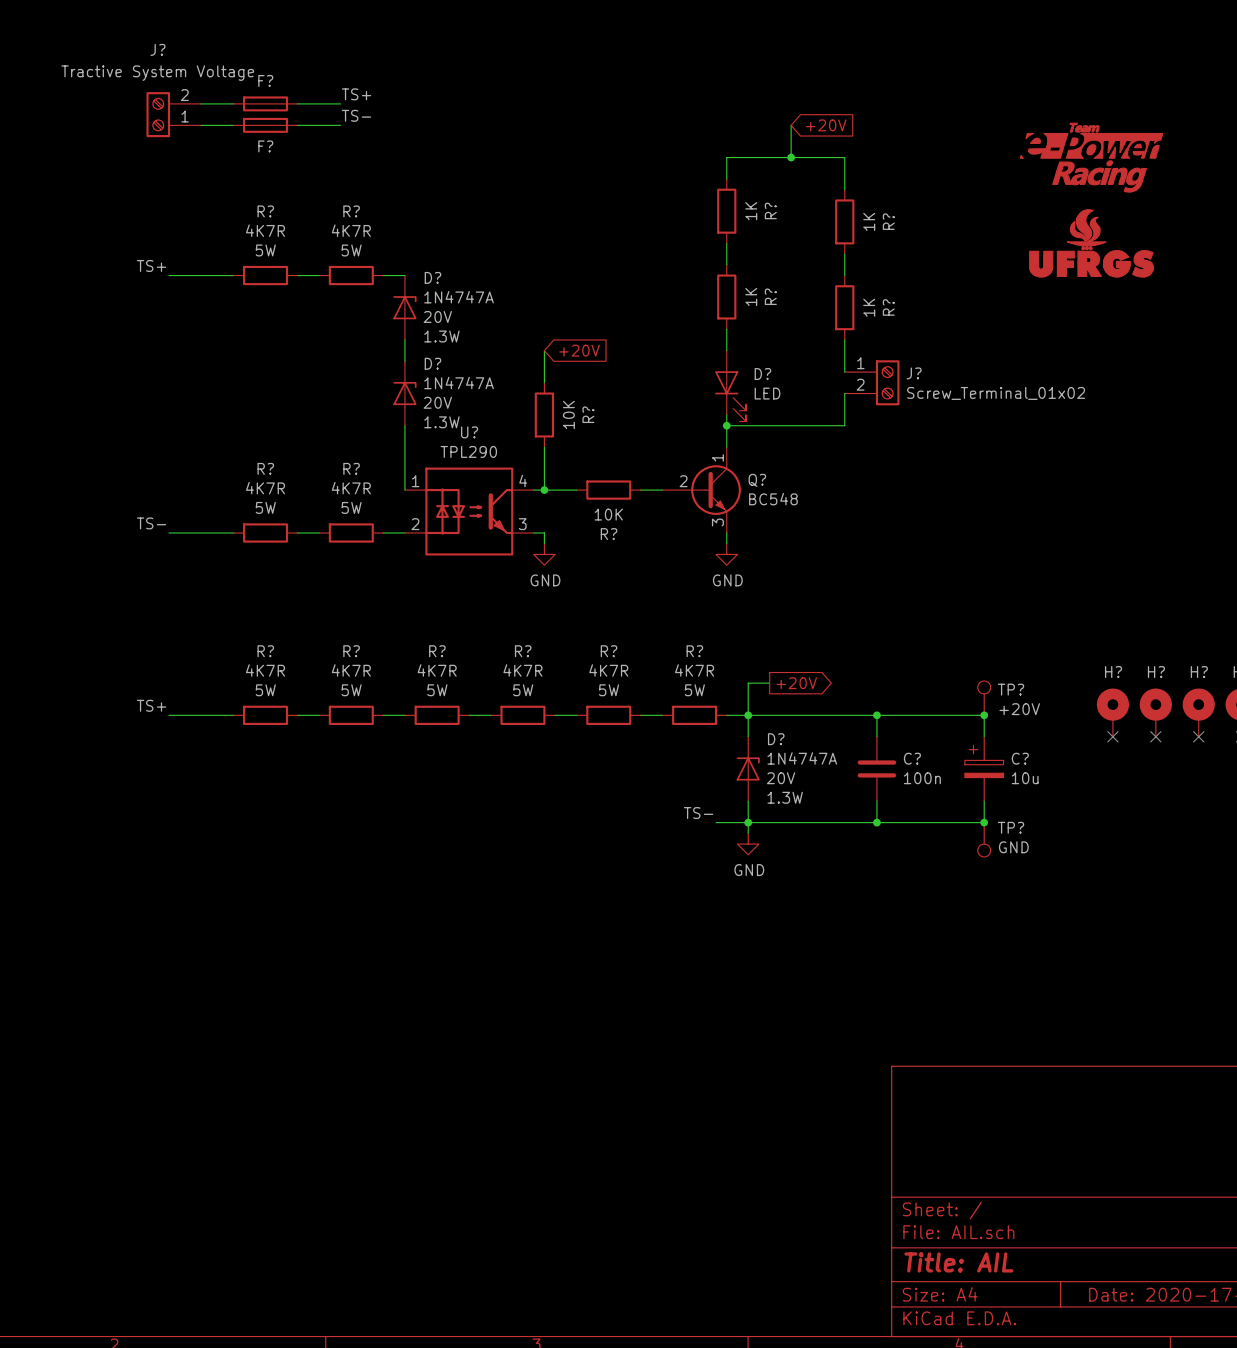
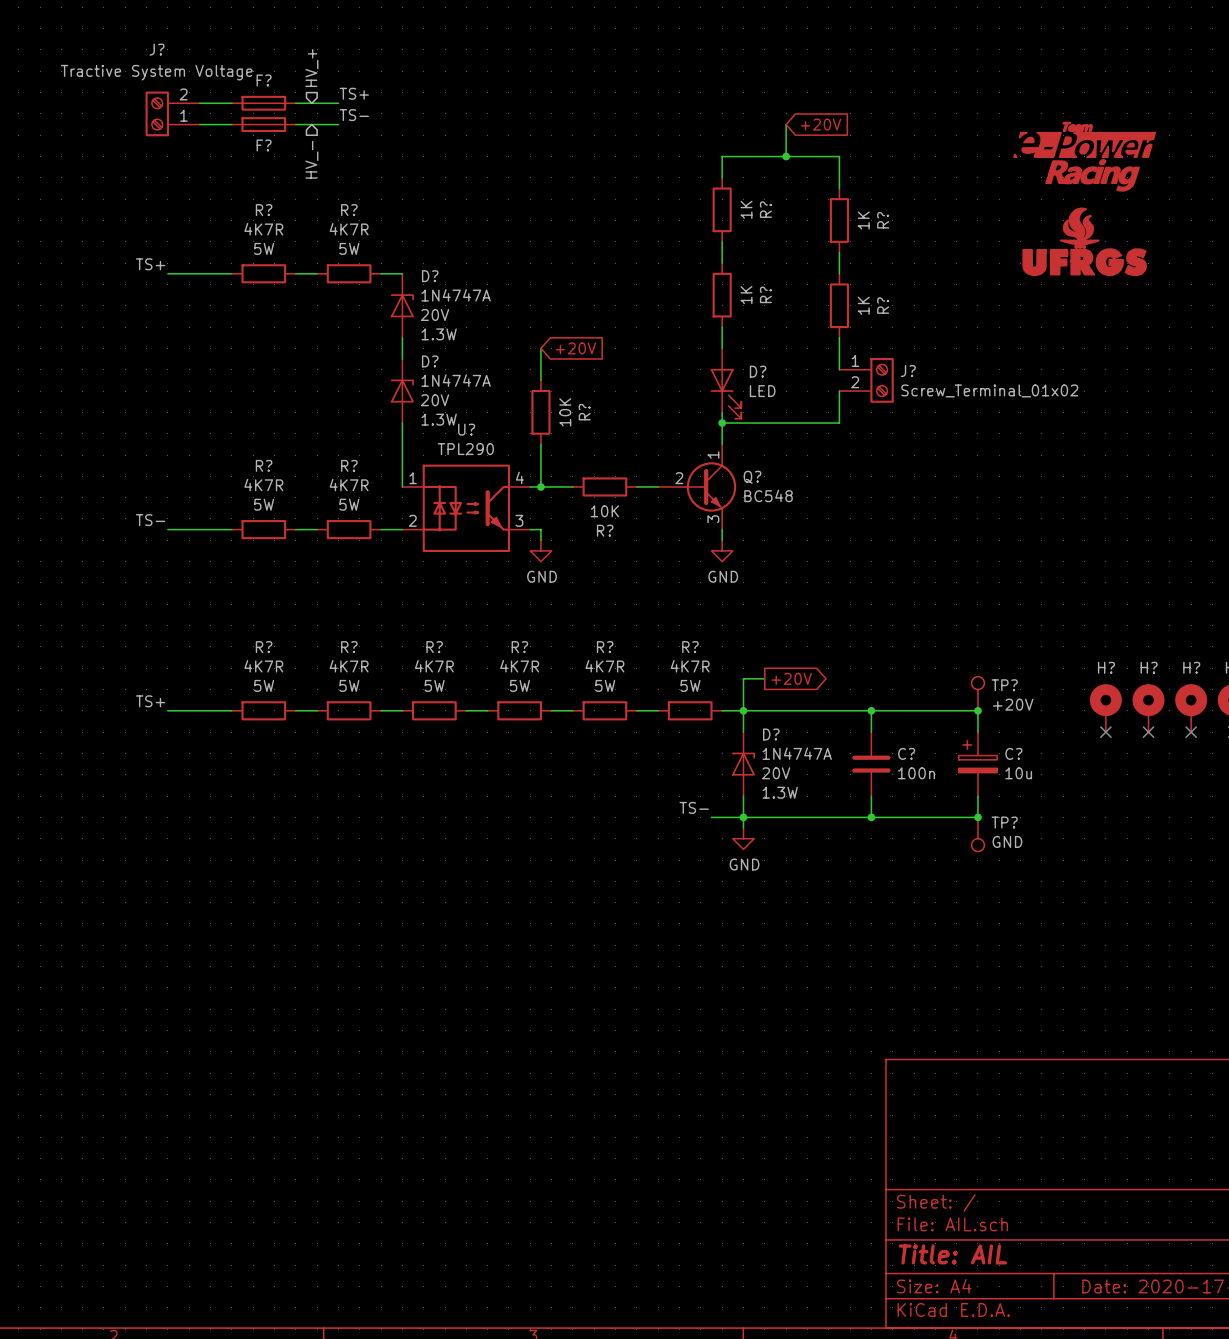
hierarchical label: none -> HV_+ (311, 68)
hierarchical label: none -> HV_- (311, 159)

